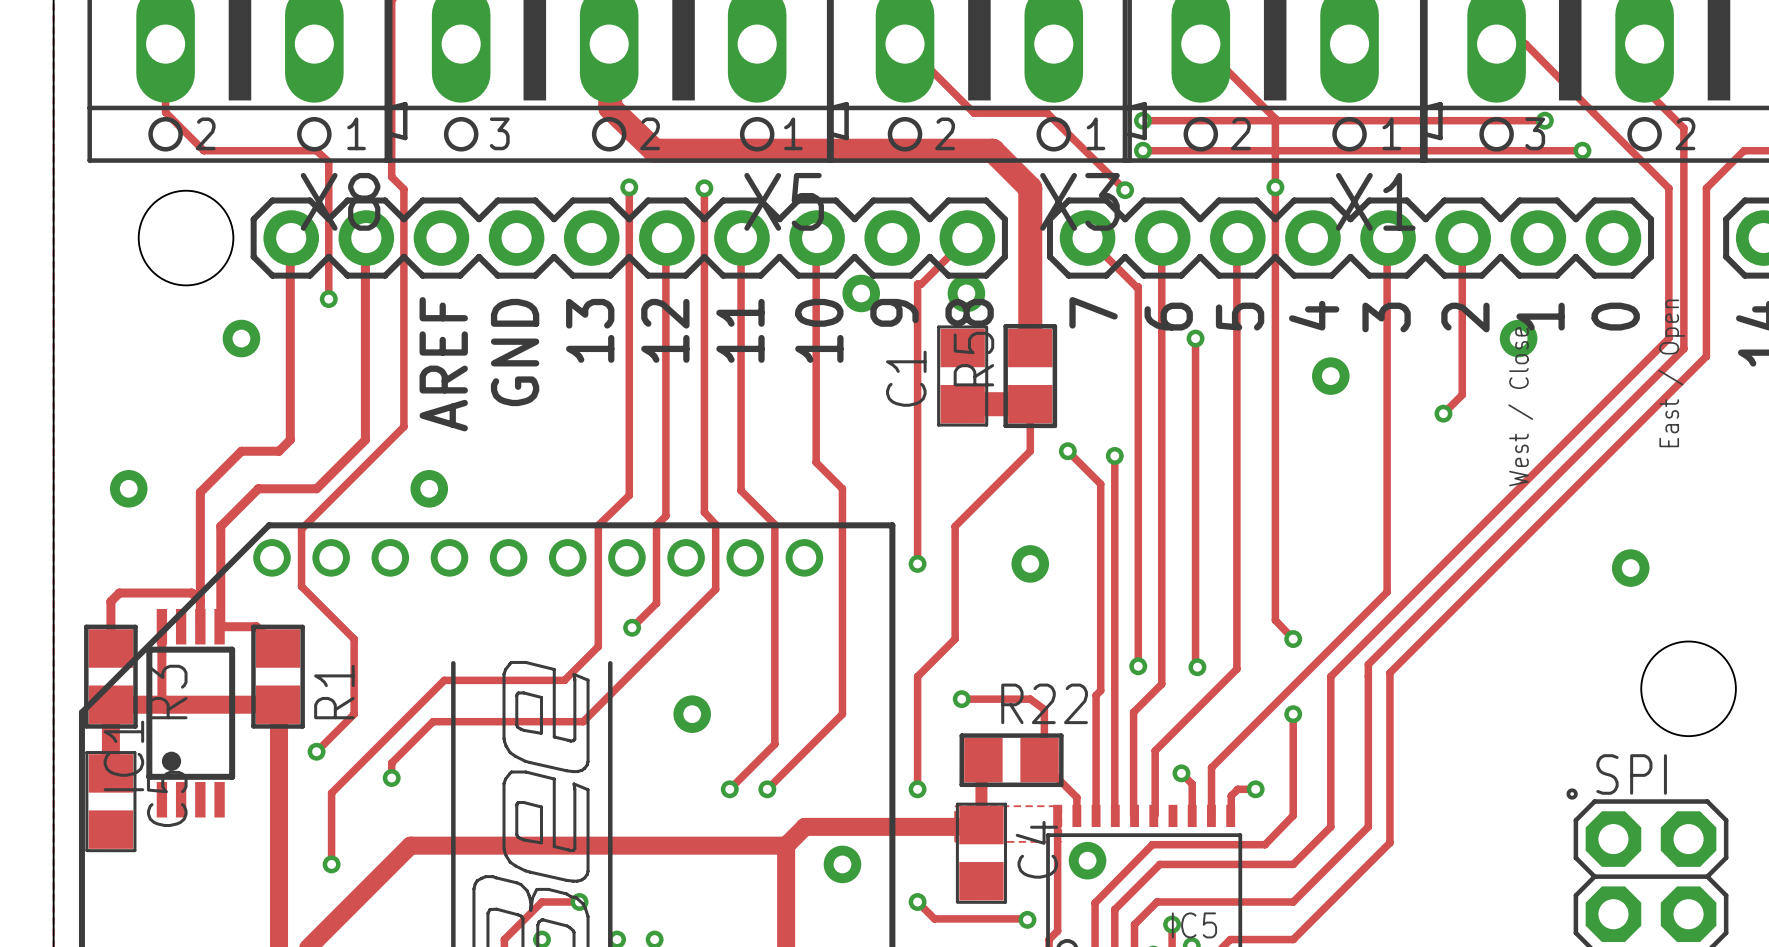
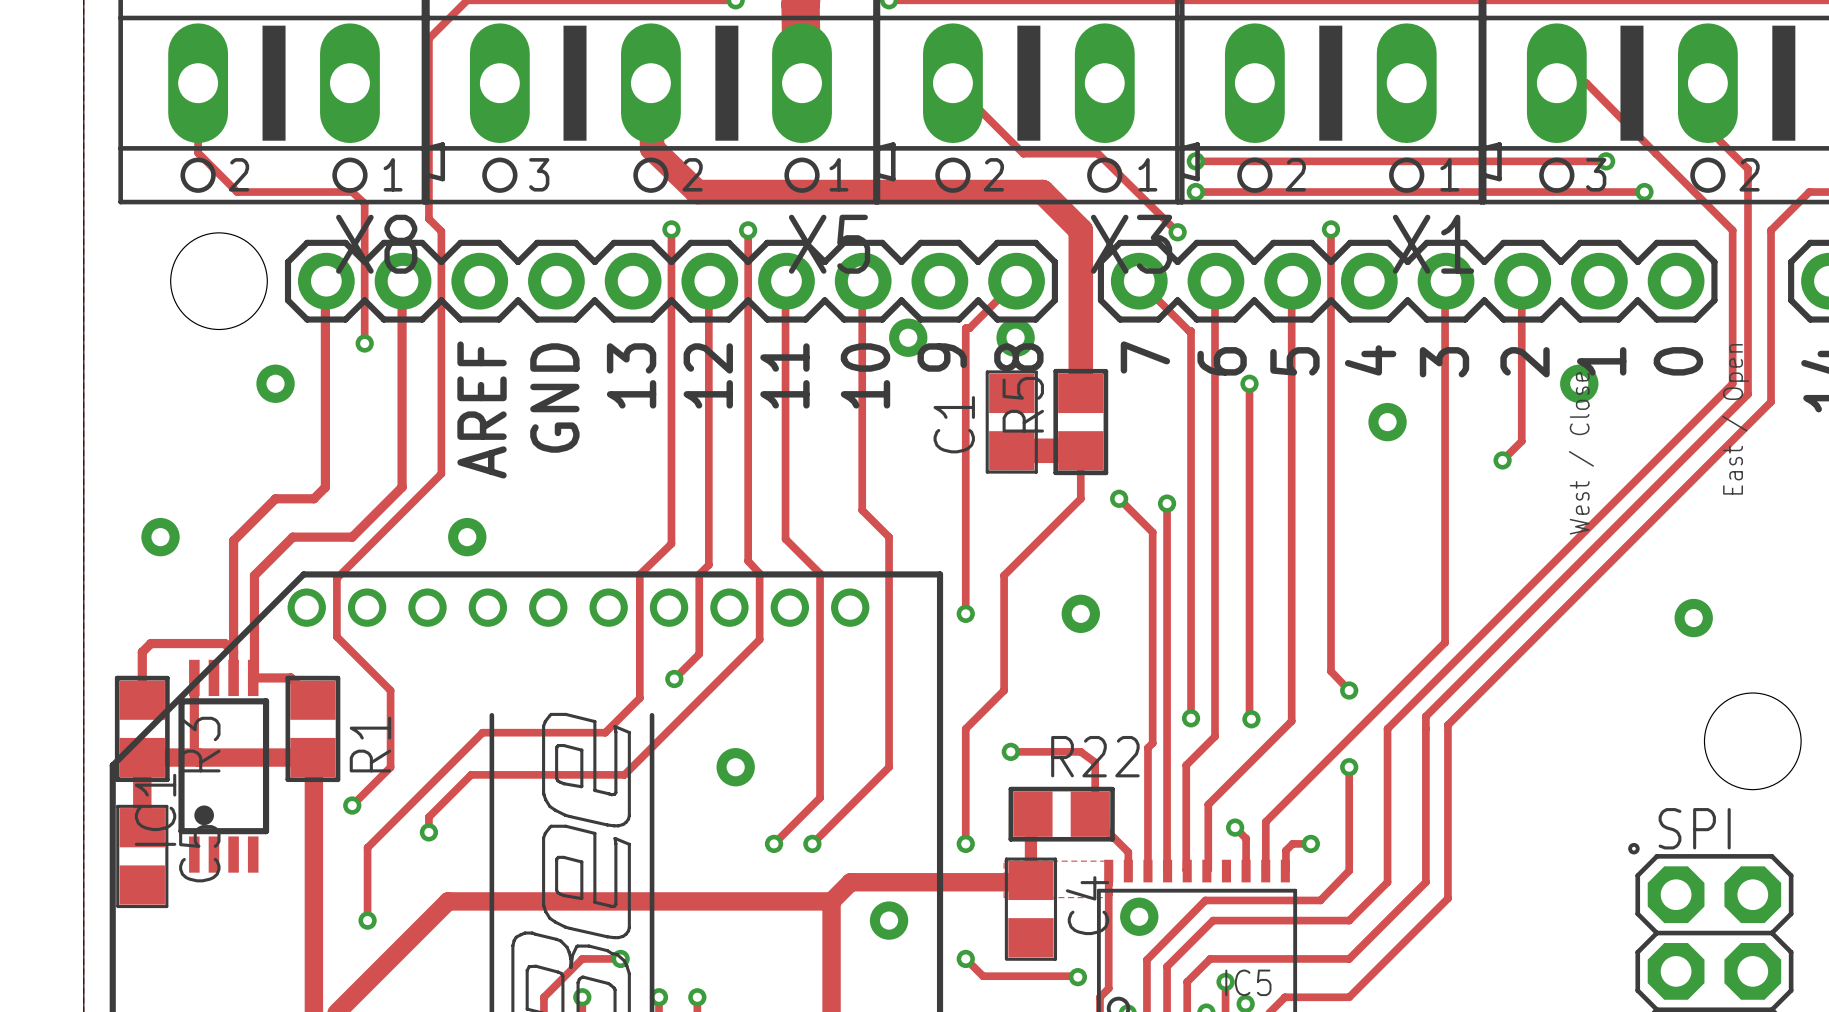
track: (1200, 44) (1275, 118) (1275, 187) -> none

